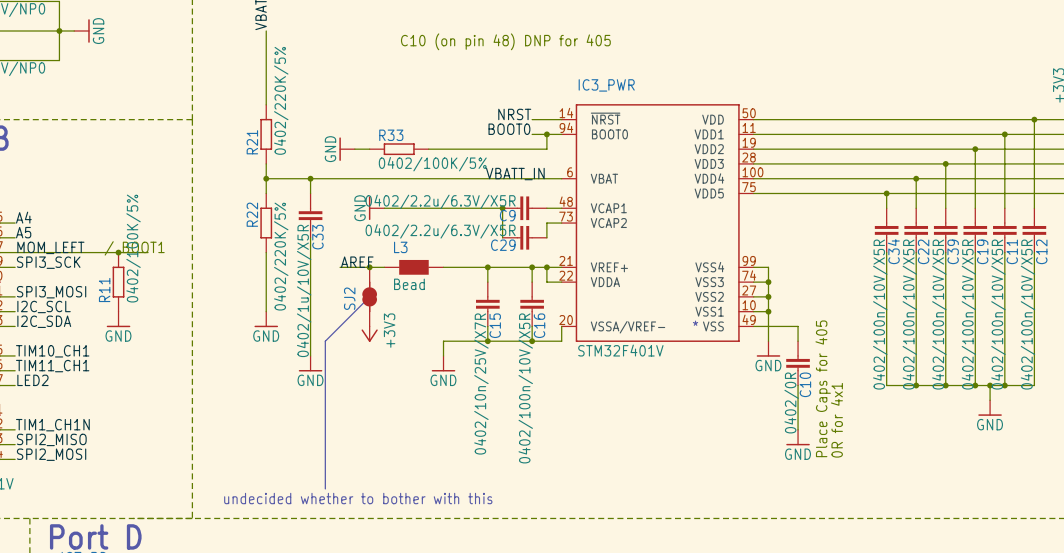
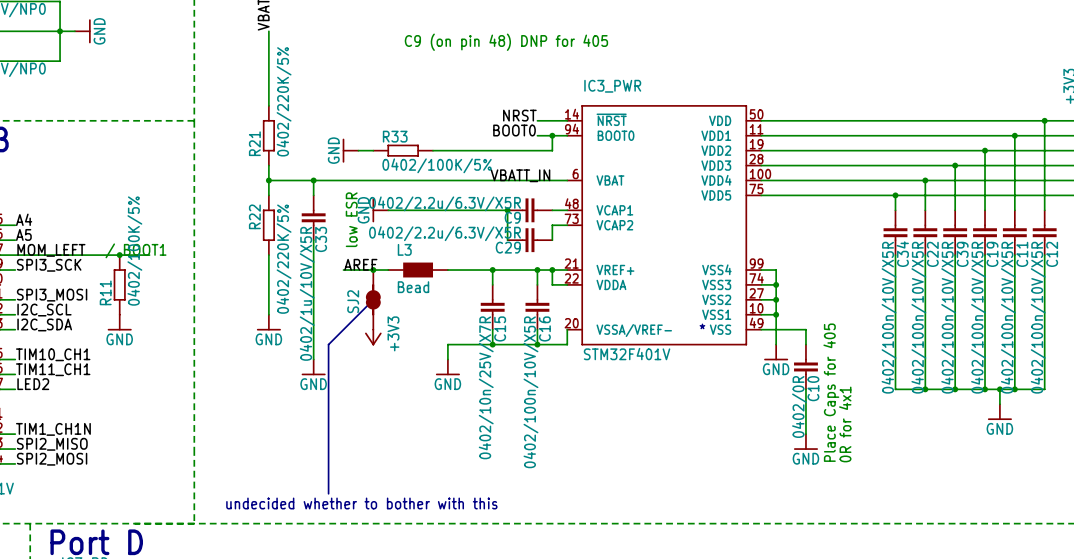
text: C10 (on pin 48) DNP for 405 (505, 41) -> C9 (on pin 48) DNP for 405 (506, 42)
text: none -> low ESR (351, 219)

